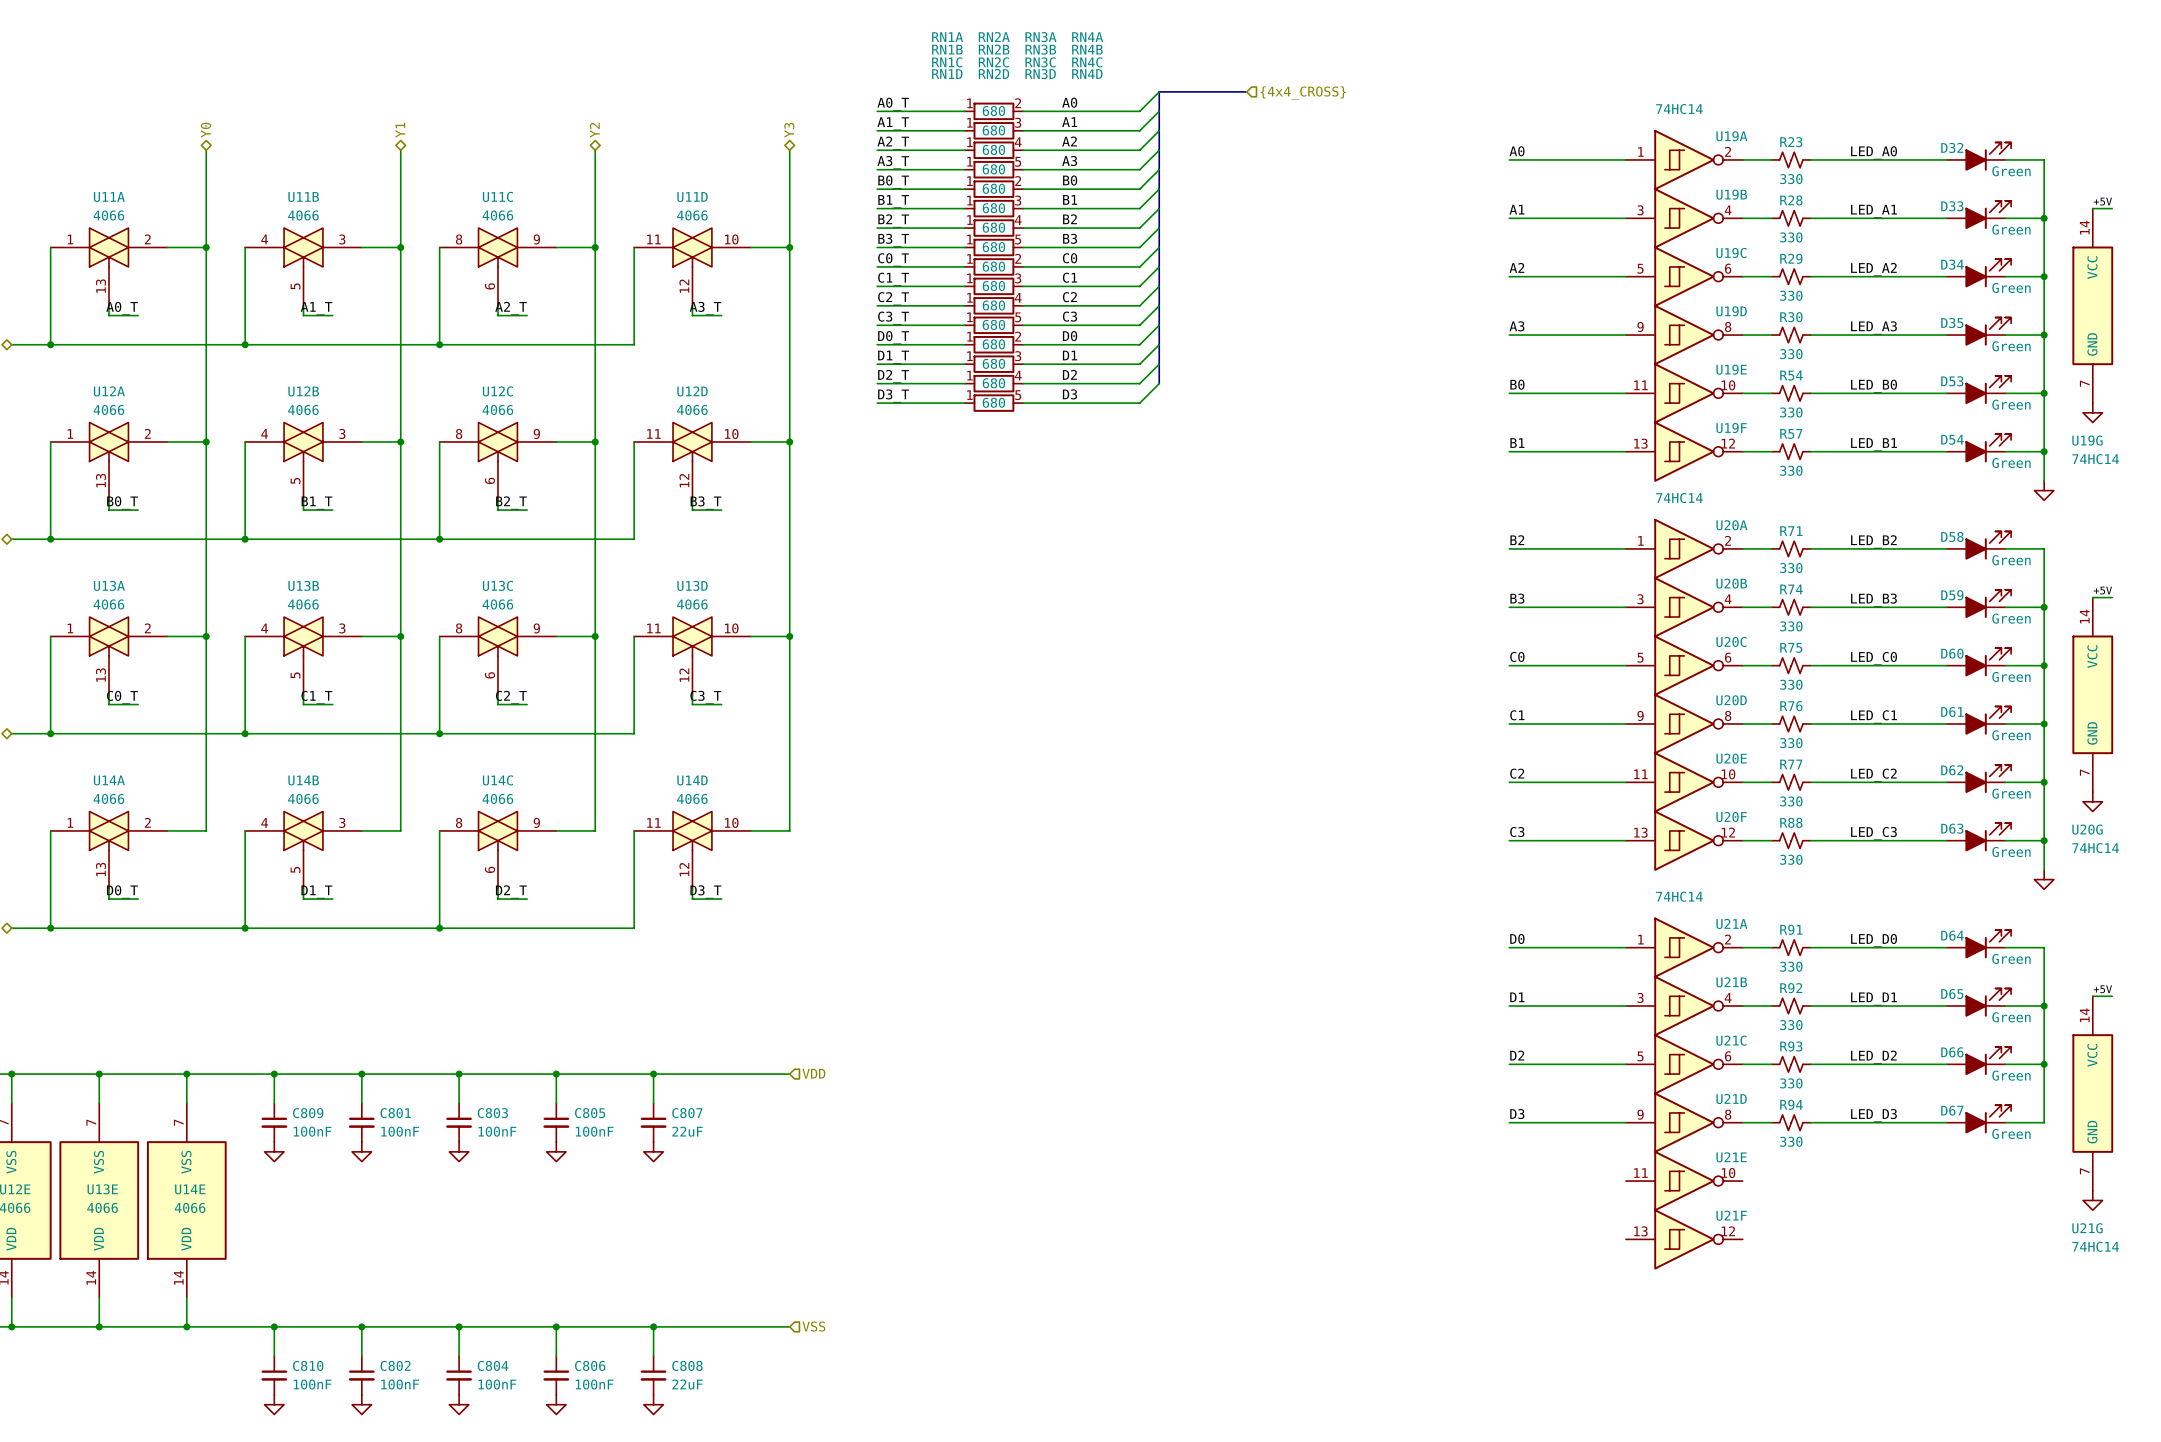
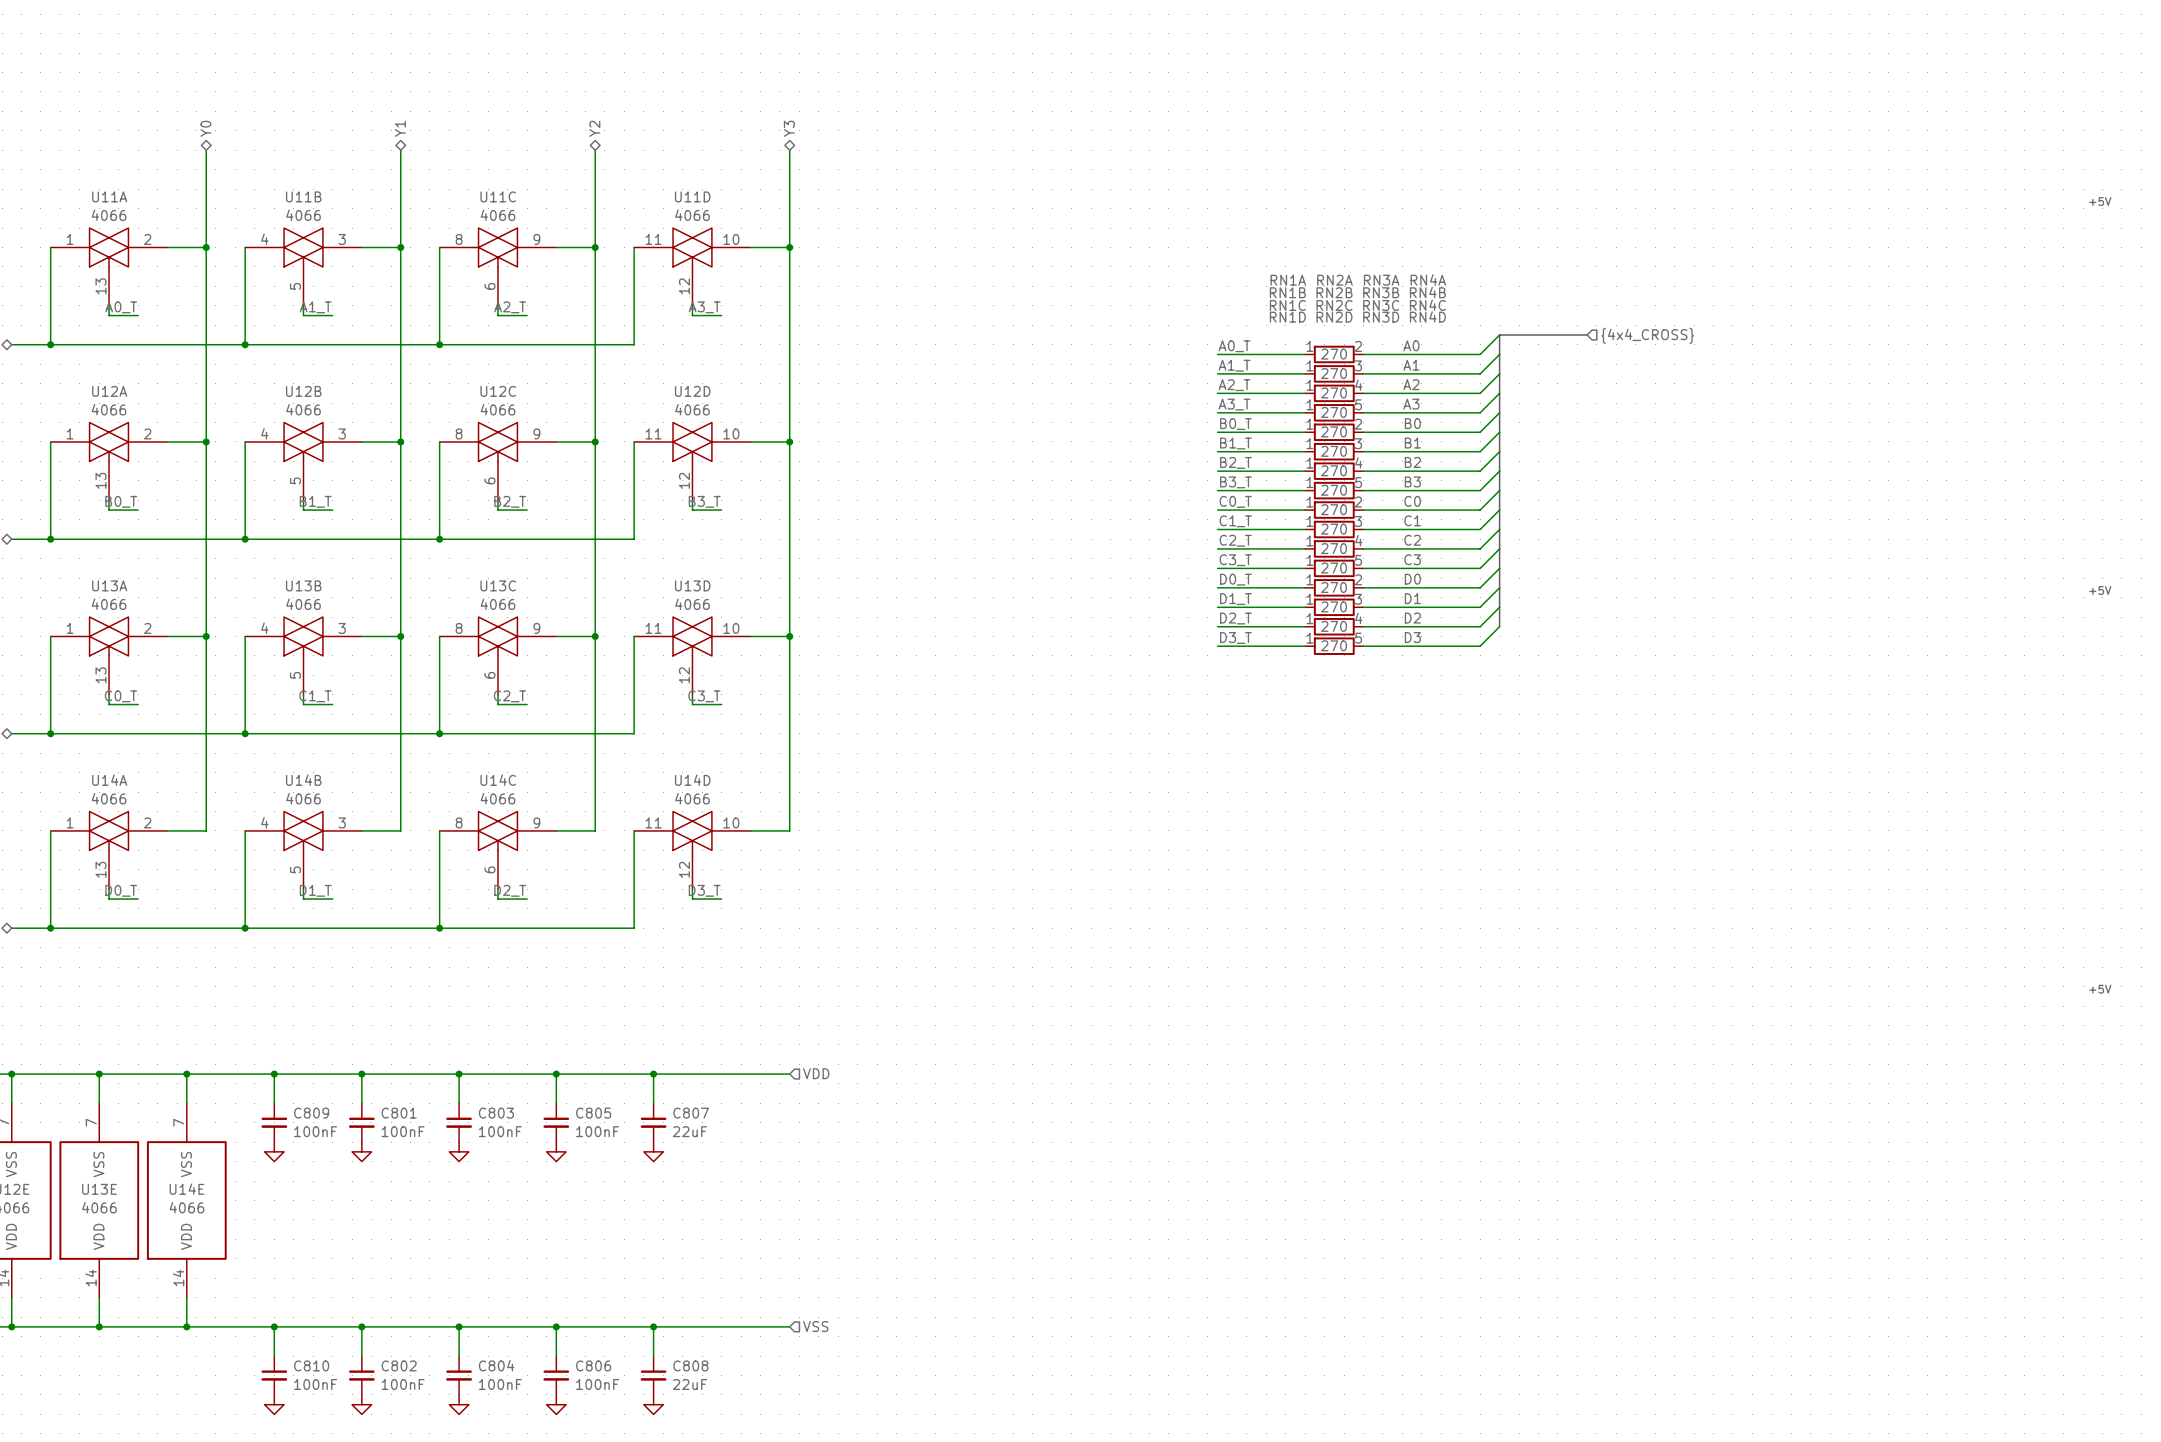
wire: (1159, 91) (1139, 111) (1023, 111) -> none
bus: (1246, 91) (1159, 91) (1159, 383) -> none
hierarchical label: {4x4_CROSS} (1303, 92) -> none
label: A0 (1069, 102) -> none
label: A0_T (893, 104) -> none
wire: (877, 111) (964, 111) -> none
RN1A position: (993, 111) -> (1334, 354)
RN1A value: 680 (993, 111) -> 270 (1334, 354)
wire: (1159, 111) (1139, 130) (1023, 130) -> none
label: A1 (1069, 122) -> none
label: A1_T (893, 123) -> none
wire: (877, 130) (964, 130) -> none
RN1B position: (993, 130) -> (1334, 373)
RN1B value: 680 (993, 130) -> 270 (1334, 373)
wire: (1159, 130) (1139, 150) (1023, 150) -> none
label: A2 (1069, 141) -> none
label: A2_T (893, 143) -> none
RN1C value: 680 (993, 149) -> 270 (1334, 393)
wire: (877, 150) (964, 150) -> none
RN1C position: (993, 150) -> (1334, 393)
wire: (1159, 150) (1139, 169) (1023, 169) -> none
label: A0 (1517, 151) -> none
label: LED_A0 (1874, 152) -> none
D32: Green (1979, 156) -> none
wire: (1509, 159) (1626, 159) -> none
U19A: 74HC14 (1684, 159) -> none
wire: (1742, 159) (1771, 159) -> none
R23: 330 (1791, 159) -> none
wire: (1810, 159) (1946, 159) -> none
wire: (2005, 159) (2044, 159) (2044, 480) -> none
label: A3 (1069, 161) -> none
label: A3_T (893, 162) -> none
wire: (877, 169) (964, 169) -> none
RN1D position: (993, 169) -> (1334, 412)
RN1D value: 680 (993, 169) -> 270 (1334, 412)
wire: (1159, 169) (1139, 189) (1023, 189) -> none
label: B0 (1070, 180) -> none
label: B0_T (893, 181) -> none
RN2A value: 680 (993, 188) -> 270 (1334, 431)
wire: (877, 189) (964, 189) -> none
RN2A position: (993, 189) -> (1334, 432)
wire: (1159, 189) (1139, 208) (1023, 208) -> none
label: B1 (1070, 199) -> none
label: B1_T (893, 201) -> none
wire: (877, 208) (964, 208) -> none
RN2B position: (993, 208) -> (1334, 451)
RN2B value: 680 (993, 208) -> 270 (1334, 451)
wire: (1159, 208) (1139, 228) (1023, 228) -> none
wire: (2092, 208) (2112, 208) -> none
label position: A1 (1517, 209) -> A1 (1411, 365)
label: LED_A1 (1874, 211) -> none
D33: Green (1979, 214) -> none
wire: (1509, 218) (1626, 218) -> none
U19B: (1684, 218) -> none
wire: (1742, 218) (1771, 218) -> none
R28: 330 (1791, 218) -> none
wire: (1810, 218) (1946, 218) -> none
wire: (2005, 218) (2044, 218) -> none
junction: (2044, 218) -> none
label: B2 (1070, 219) -> none
label: B2_T (893, 220) -> none
RN2C value: 680 (993, 227) -> 270 (1334, 470)
wire: (877, 228) (964, 228) -> none
RN2C position: (993, 228) -> (1334, 471)
wire: (1159, 228) (1139, 247) (1023, 247) -> none
label: B3 (1070, 238) -> none
label: B3_T (893, 240) -> none
wire: (877, 247) (964, 247) -> none
RN2D position: (993, 247) -> (1334, 490)
RN2D value: 680 (993, 247) -> 270 (1334, 490)
wire: (1159, 247) (1139, 266) (1023, 266) -> none
label: C0 (1070, 258) -> none
label: C0_T (893, 259) -> none
wire: (877, 266) (964, 266) -> none
RN3A position: (993, 266) -> (1334, 510)
RN3A value: 680 (993, 266) -> 270 (1334, 509)
wire: (1159, 266) (1139, 286) (1023, 286) -> none
label position: A2 (1516, 267) -> A2 (1411, 384)
label: LED_A2 (1873, 269) -> none
D34: Green (1979, 273) -> none
wire: (1509, 276) (1626, 276) -> none
U19C: (1684, 276) -> none
wire: (1742, 276) (1771, 276) -> none
R29: 330 (1791, 276) -> none
wire: (1810, 276) (1946, 276) -> none
wire: (2005, 276) (2044, 276) -> none
junction: (2044, 276) -> none
label: C1 (1070, 277) -> none
label: C1_T (893, 279) -> none
wire: (877, 286) (964, 286) -> none
RN3B position: (993, 286) -> (1334, 529)
RN3B value: 680 (993, 286) -> 270 (1334, 529)
wire: (1159, 286) (1139, 305) (1023, 305) -> none
label: C2 (1069, 297) -> none
label: C2_T (893, 298) -> none
wire: (877, 305) (964, 305) -> none
RN3C position: (993, 305) -> (1334, 548)
RN3C value: 680 (993, 305) -> 270 (1334, 548)
wire: (1159, 305) (1139, 325) (1023, 325) -> none
U19G: 74HC14 (2092, 305) -> none
label: C3 (1069, 316) -> none
label: C3_T (893, 318) -> none
RN3D value: 680 (993, 324) -> 270 (1334, 568)
wire: (877, 325) (964, 325) -> none
RN3D position: (993, 325) -> (1334, 568)
wire: (1159, 325) (1139, 344) (1023, 344) -> none
label position: A3 (1516, 326) -> A3 (1411, 404)
label: LED_A3 (1873, 327) -> none
D35: Green (1979, 331) -> none
wire: none -> (1499, 335) (1480, 354) (1363, 354)
bus: none -> (1587, 335) (1499, 335) (1499, 626)
U19D: (1684, 335) -> none
wire: (1742, 335) (1771, 335) -> none
R30: 330 (1791, 335) -> none
wire: (1810, 335) (1946, 335) -> none
wire: (2005, 335) (2044, 335) -> none
junction: (2044, 335) -> none
label: D0 (1070, 336) -> none
hierarchical label: none -> {4x4_CROSS} (1647, 335)
label: D0_T (893, 337) -> none
wire: (877, 344) (964, 344) -> none
RN4A position: (993, 344) -> (1334, 587)
RN4A value: 680 (993, 344) -> 270 (1334, 587)
wire: (1159, 344) (1139, 364) (1023, 364) -> none
label: none -> A0 (1411, 345)
label: none -> A0_T (1234, 346)
wire: none -> (1217, 354) (1305, 354)
wire: none -> (1499, 354) (1480, 373) (1363, 373)
label: D1 (1070, 355) -> none
label: D1_T (893, 357) -> none
RN4B value: 680 (993, 363) -> 270 (1334, 606)
wire: (877, 364) (964, 364) -> none
RN4B position: (993, 364) -> (1334, 607)
wire: (1159, 364) (1139, 383) (1023, 383) -> none
label: none -> A1_T (1234, 365)
wire: none -> (1217, 373) (1305, 373)
wire: none -> (1499, 373) (1480, 393) (1363, 393)
label: D2 (1069, 374) -> none
label: D2_T (893, 376) -> none
wire: (877, 383) (964, 383) -> none
RN4C position: (993, 383) -> (1334, 626)
RN4C value: 680 (993, 383) -> 270 (1334, 626)
wire: (1159, 383) (1139, 403) (1023, 403) -> none
label position: B0 (1517, 384) -> B0 (1412, 423)
label: none -> A2_T (1234, 385)
label: LED_B0 (1874, 386) -> none
D53: Green (1979, 389) -> none
wire: none -> (1217, 393) (1305, 393)
wire: none -> (1499, 393) (1480, 412) (1363, 412)
wire: (1509, 393) (1626, 393) -> none
U19E: (1684, 393) -> none
wire: (1742, 393) (1771, 393) -> none
R54: 330 (1791, 393) -> none
wire: (1810, 393) (1946, 393) -> none
wire: (2005, 393) (2044, 393) -> none
junction: (2044, 393) -> none
label: D3 (1069, 394) -> none
label: D3_T (893, 395) -> none
RN4D value: 680 (993, 402) -> 270 (1334, 645)
wire: (877, 403) (964, 403) -> none
RN4D position: (993, 403) -> (1334, 646)
label: none -> A3_T (1234, 404)
wire: none -> (1217, 412) (1305, 412)
wire: none -> (1499, 412) (1480, 432) (1363, 432)
power symbol: (2092, 412) -> none
label: none -> B0_T (1235, 424)
wire: none -> (1217, 432) (1305, 432)
wire: none -> (1499, 432) (1480, 451) (1363, 451)
label position: B1 (1517, 443) -> B1 (1412, 443)
label: none -> B1_T (1235, 443)
label: LED_B1 (1874, 444) -> none
D54: Green (1979, 448) -> none
wire: none -> (1217, 451) (1305, 451)
wire: none -> (1499, 451) (1480, 471) (1363, 471)
wire: (1509, 451) (1626, 451) -> none
U19F: (1684, 451) -> none
wire: (1742, 451) (1771, 451) -> none
R57: 330 (1791, 451) -> none
wire: (1810, 451) (1946, 451) -> none
wire: (2005, 451) (2044, 451) -> none
junction: (2044, 451) -> none
label: none -> B2_T (1235, 462)
wire: none -> (1217, 471) (1305, 471)
wire: none -> (1499, 471) (1480, 490) (1363, 490)
label: none -> B3_T (1235, 482)
wire: none -> (1217, 490) (1305, 490)
wire: none -> (1499, 490) (1480, 510) (1363, 510)
power symbol: (2044, 490) -> none
label: none -> C0_T (1235, 501)
wire: none -> (1217, 510) (1305, 510)
wire: none -> (1499, 510) (1480, 529) (1363, 529)
label: none -> C1 (1412, 520)
label: none -> C1_T (1235, 521)
wire: none -> (1217, 529) (1305, 529)
wire: none -> (1499, 529) (1480, 548) (1363, 548)
label: none -> C2 (1412, 540)
label position: B2 (1517, 540) -> B2 (1412, 462)
label: none -> C2_T (1235, 540)
label: LED_B2 (1873, 541) -> none
D58: Green (1979, 545) -> none
wire: none -> (1217, 548) (1305, 548)
wire: none -> (1499, 548) (1480, 568) (1363, 568)
wire: (1509, 548) (1626, 548) -> none
U20A: 74HC14 (1684, 548) -> none
wire: (1742, 548) (1771, 548) -> none
R71: 330 (1791, 548) -> none
wire: (1810, 548) (1946, 548) -> none
wire: (2005, 548) (2044, 548) (2044, 869) -> none
label: none -> C3 (1412, 559)
label: none -> C3_T (1235, 560)
wire: none -> (1217, 568) (1305, 568)
wire: none -> (1499, 568) (1480, 587) (1363, 587)
label: none -> D0 (1412, 579)
label: none -> D0_T (1235, 579)
wire: none -> (1217, 587) (1305, 587)
wire: none -> (1499, 587) (1480, 607) (1363, 607)
wire: (2092, 597) (2112, 597) -> none
label: none -> D1 (1412, 598)
label position: B3 (1517, 598) -> B3 (1412, 481)
label: none -> D1_T (1235, 599)
label: LED_B3 (1873, 600) -> none
D59: Green (1979, 603) -> none
wire: none -> (1217, 607) (1305, 607)
wire: none -> (1499, 607) (1480, 626) (1363, 626)
wire: (1509, 607) (1626, 607) -> none
U20B: (1684, 607) -> none
wire: (1742, 607) (1771, 607) -> none
R74: 330 (1791, 607) -> none
wire: (1810, 607) (1946, 607) -> none
wire: (2005, 607) (2044, 607) -> none
junction: (2044, 607) -> none
label: none -> D2 (1412, 618)
label: none -> D2_T (1235, 618)
wire: none -> (1217, 626) (1305, 626)
wire: none -> (1499, 626) (1480, 646) (1363, 646)
label: none -> D3 (1412, 637)
label: none -> D3_T (1235, 637)
wire: none -> (1217, 646) (1305, 646)
label position: C0 (1517, 656) -> C0 (1412, 501)
label: LED_C0 (1874, 658) -> none
D60: Green (1979, 662) -> none
wire: (1509, 665) (1626, 665) -> none
U20C: (1684, 665) -> none
wire: (1742, 665) (1771, 665) -> none
R75: 330 (1791, 665) -> none
wire: (1810, 665) (1946, 665) -> none
wire: (2005, 665) (2044, 665) -> none
junction: (2044, 665) -> none
U20G: 74HC14 (2092, 694) -> none
label: C1 (1517, 715) -> none
label: LED_C1 (1874, 716) -> none
D61: Green (1979, 720) -> none
wire: (1509, 723) (1626, 723) -> none
U20D: (1684, 723) -> none
wire: (1742, 723) (1771, 723) -> none
R76: 330 (1791, 723) -> none
wire: (1810, 723) (1946, 723) -> none
wire: (2005, 723) (2044, 723) -> none
junction: (2044, 723) -> none
label: C2 (1517, 773) -> none
label: LED_C2 (1873, 775) -> none
D62: Green (1979, 778) -> none
wire: (1509, 782) (1626, 782) -> none
U20E: (1684, 782) -> none
wire: (1742, 782) (1771, 782) -> none
R77: 330 (1791, 782) -> none
wire: (1810, 782) (1946, 782) -> none
wire: (2005, 782) (2044, 782) -> none
junction: (2044, 782) -> none
power symbol: (2092, 801) -> none
label: C3 (1517, 832) -> none
label: LED_C3 (1873, 833) -> none
D63: Green (1979, 837) -> none
wire: (1509, 840) (1626, 840) -> none
U20F: (1684, 840) -> none
wire: (1742, 840) (1771, 840) -> none
R88: 330 (1791, 840) -> none
wire: (1810, 840) (1946, 840) -> none
wire: (2005, 840) (2044, 840) -> none
junction: (2044, 840) -> none
power symbol: (2044, 879) -> none
label: D0 (1517, 938) -> none
label: LED_D0 (1874, 940) -> none
D64: Green (1979, 944) -> none
wire: (1509, 947) (1626, 947) -> none
U21A: 74HC14 (1684, 947) -> none
wire: (1742, 947) (1771, 947) -> none
R91: 330 (1791, 947) -> none
wire: (1810, 947) (1946, 947) -> none
wire: (2005, 947) (2044, 947) (2044, 1122) (2005, 1122) -> none
wire: (2092, 996) (2112, 996) -> none
label: D1 (1517, 997) -> none
label: LED_D1 (1874, 998) -> none
D65: Green (1979, 1002) -> none
wire: (1509, 1006) (1626, 1006) -> none
U21B: (1684, 1006) -> none
wire: (1742, 1006) (1771, 1006) -> none
R92: 330 (1791, 1006) -> none
wire: (1810, 1006) (1946, 1006) -> none
wire: (2005, 1006) (2044, 1006) -> none
junction: (2044, 1006) -> none
label: D2 (1517, 1055) -> none
label: LED_D2 (1873, 1057) -> none
D66: Green (1979, 1060) -> none
wire: (1509, 1064) (1626, 1064) -> none
U21C: (1684, 1064) -> none
wire: (1742, 1064) (1771, 1064) -> none
R93: 330 (1791, 1064) -> none
wire: (1810, 1064) (1946, 1064) -> none
wire: (2005, 1064) (2044, 1064) -> none
junction: (2044, 1064) -> none
U21G: 74HC14 (2092, 1093) -> none
label: D3 (1517, 1114) -> none
label: LED_D3 (1873, 1115) -> none
D67: Green (1979, 1119) -> none
wire: (1509, 1122) (1626, 1122) -> none
U21D: (1684, 1122) -> none
wire: (1742, 1122) (1771, 1122) -> none
R94: 330 (1791, 1122) -> none
wire: (1810, 1122) (1946, 1122) -> none
U21E: (1684, 1181) -> none
power symbol: (2092, 1200) -> none
U21F: (1684, 1239) -> none

